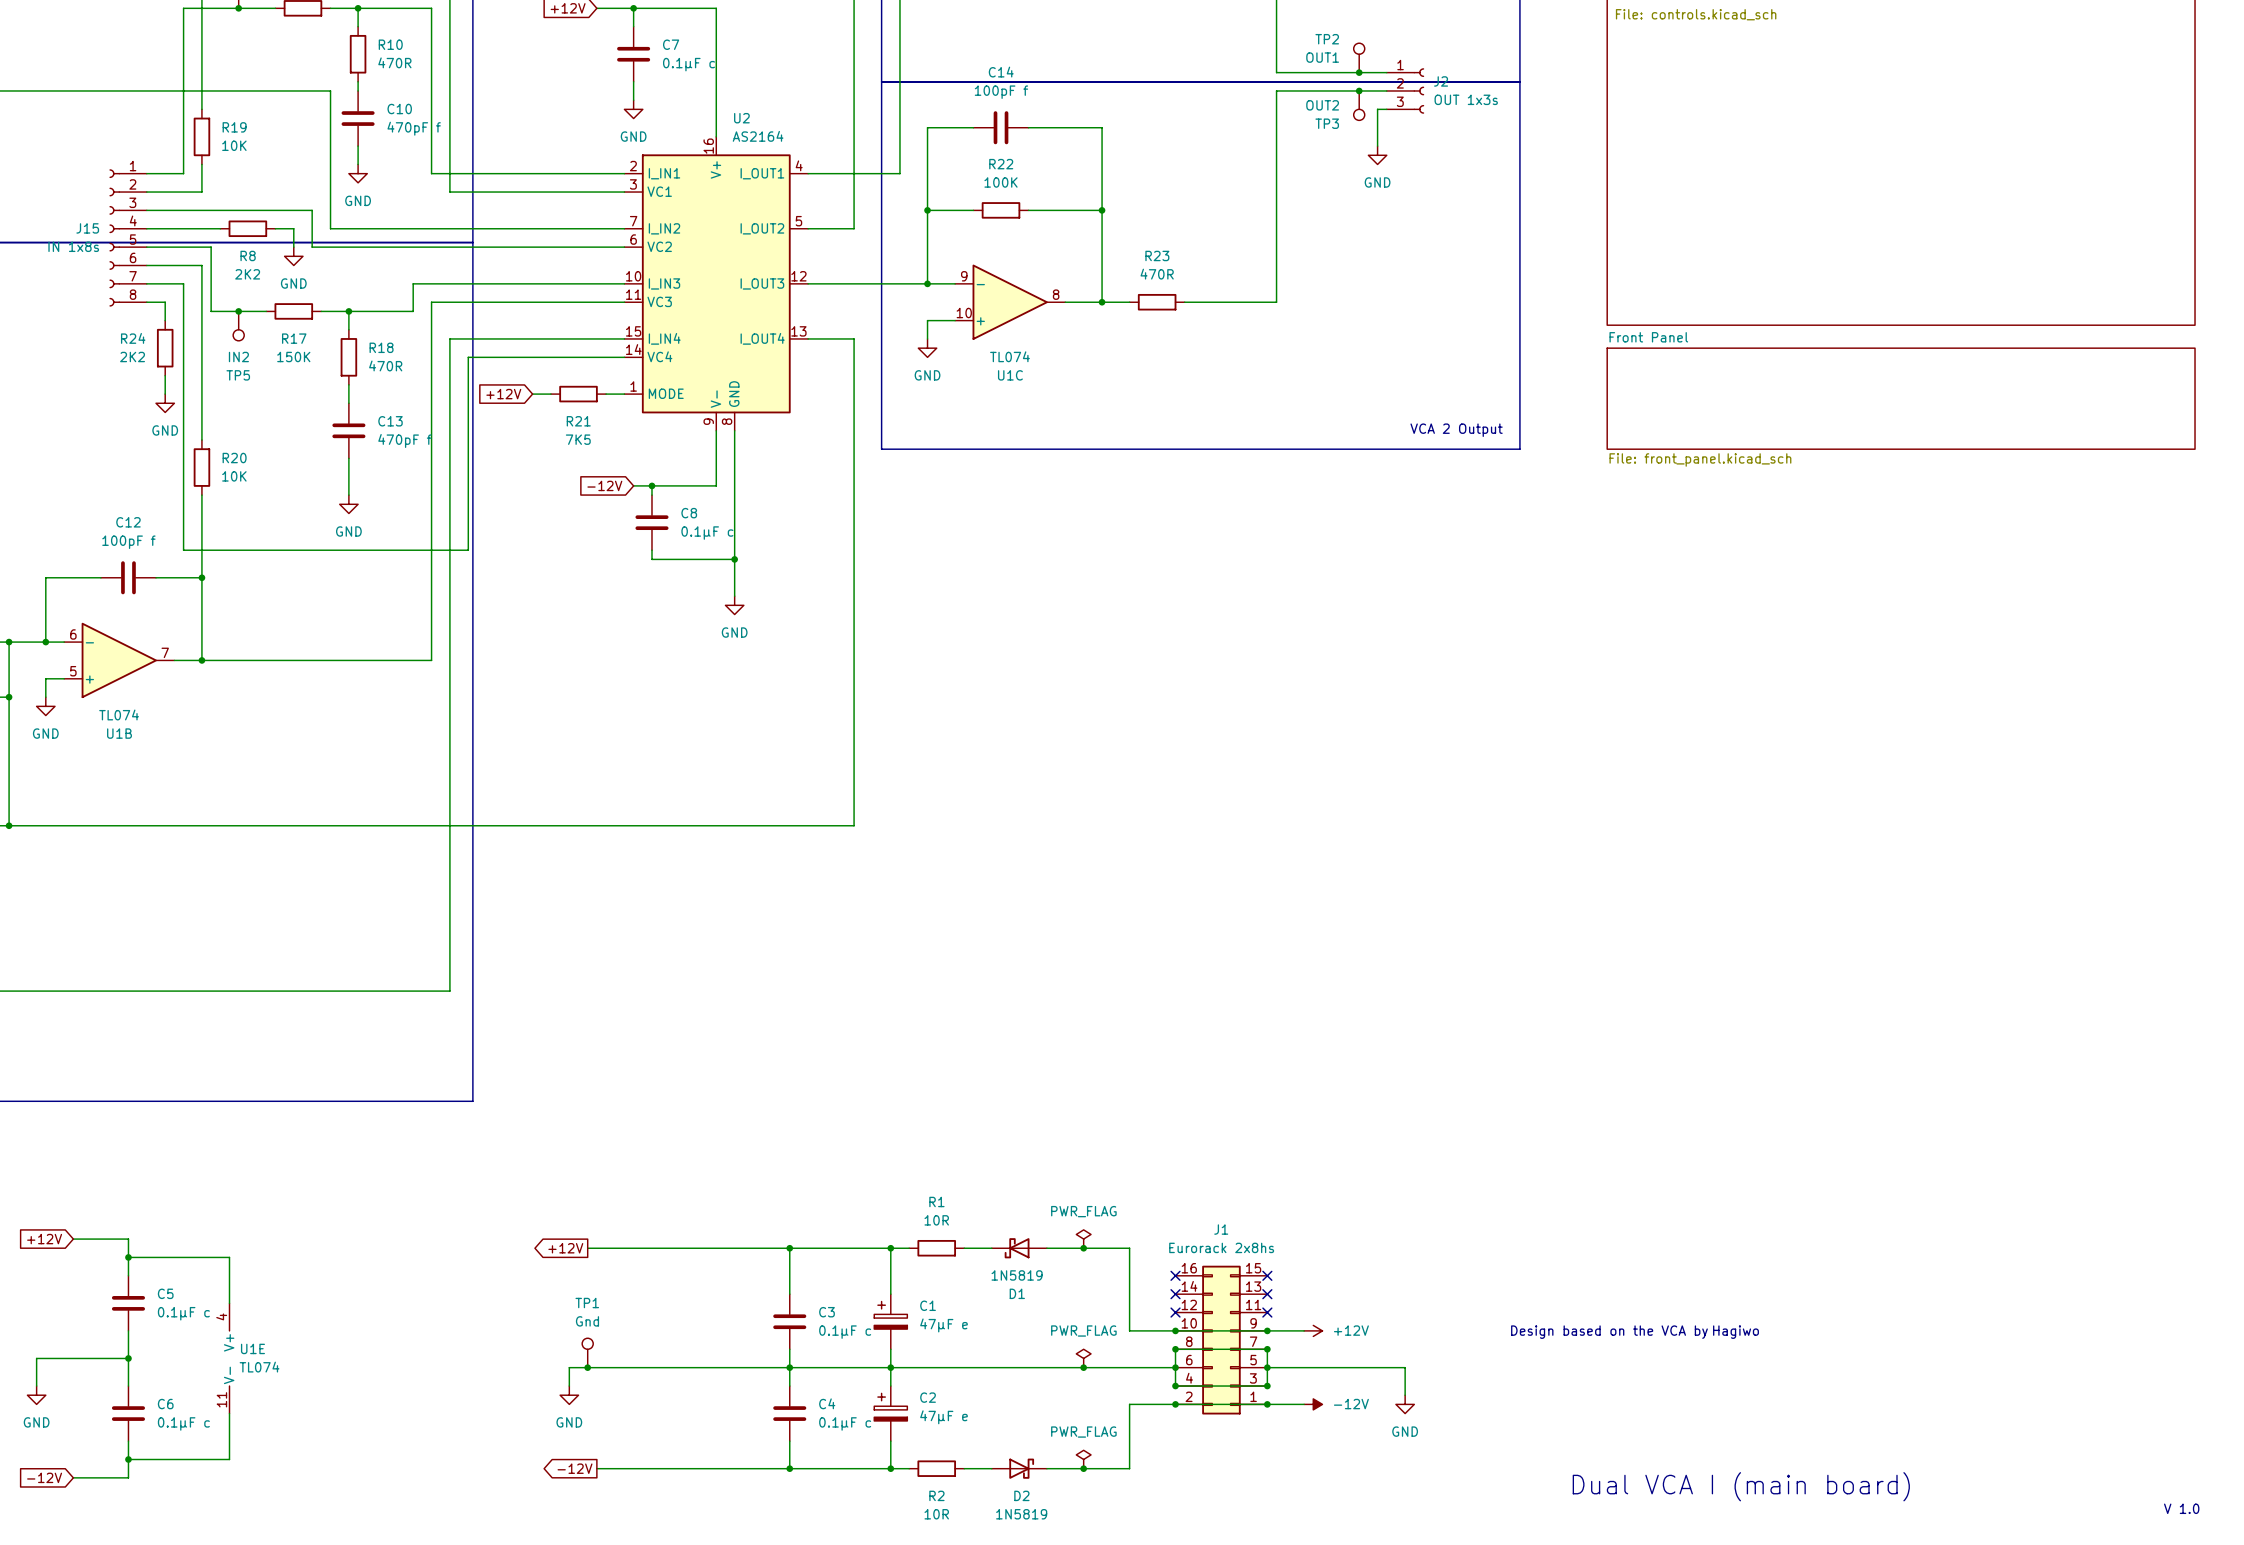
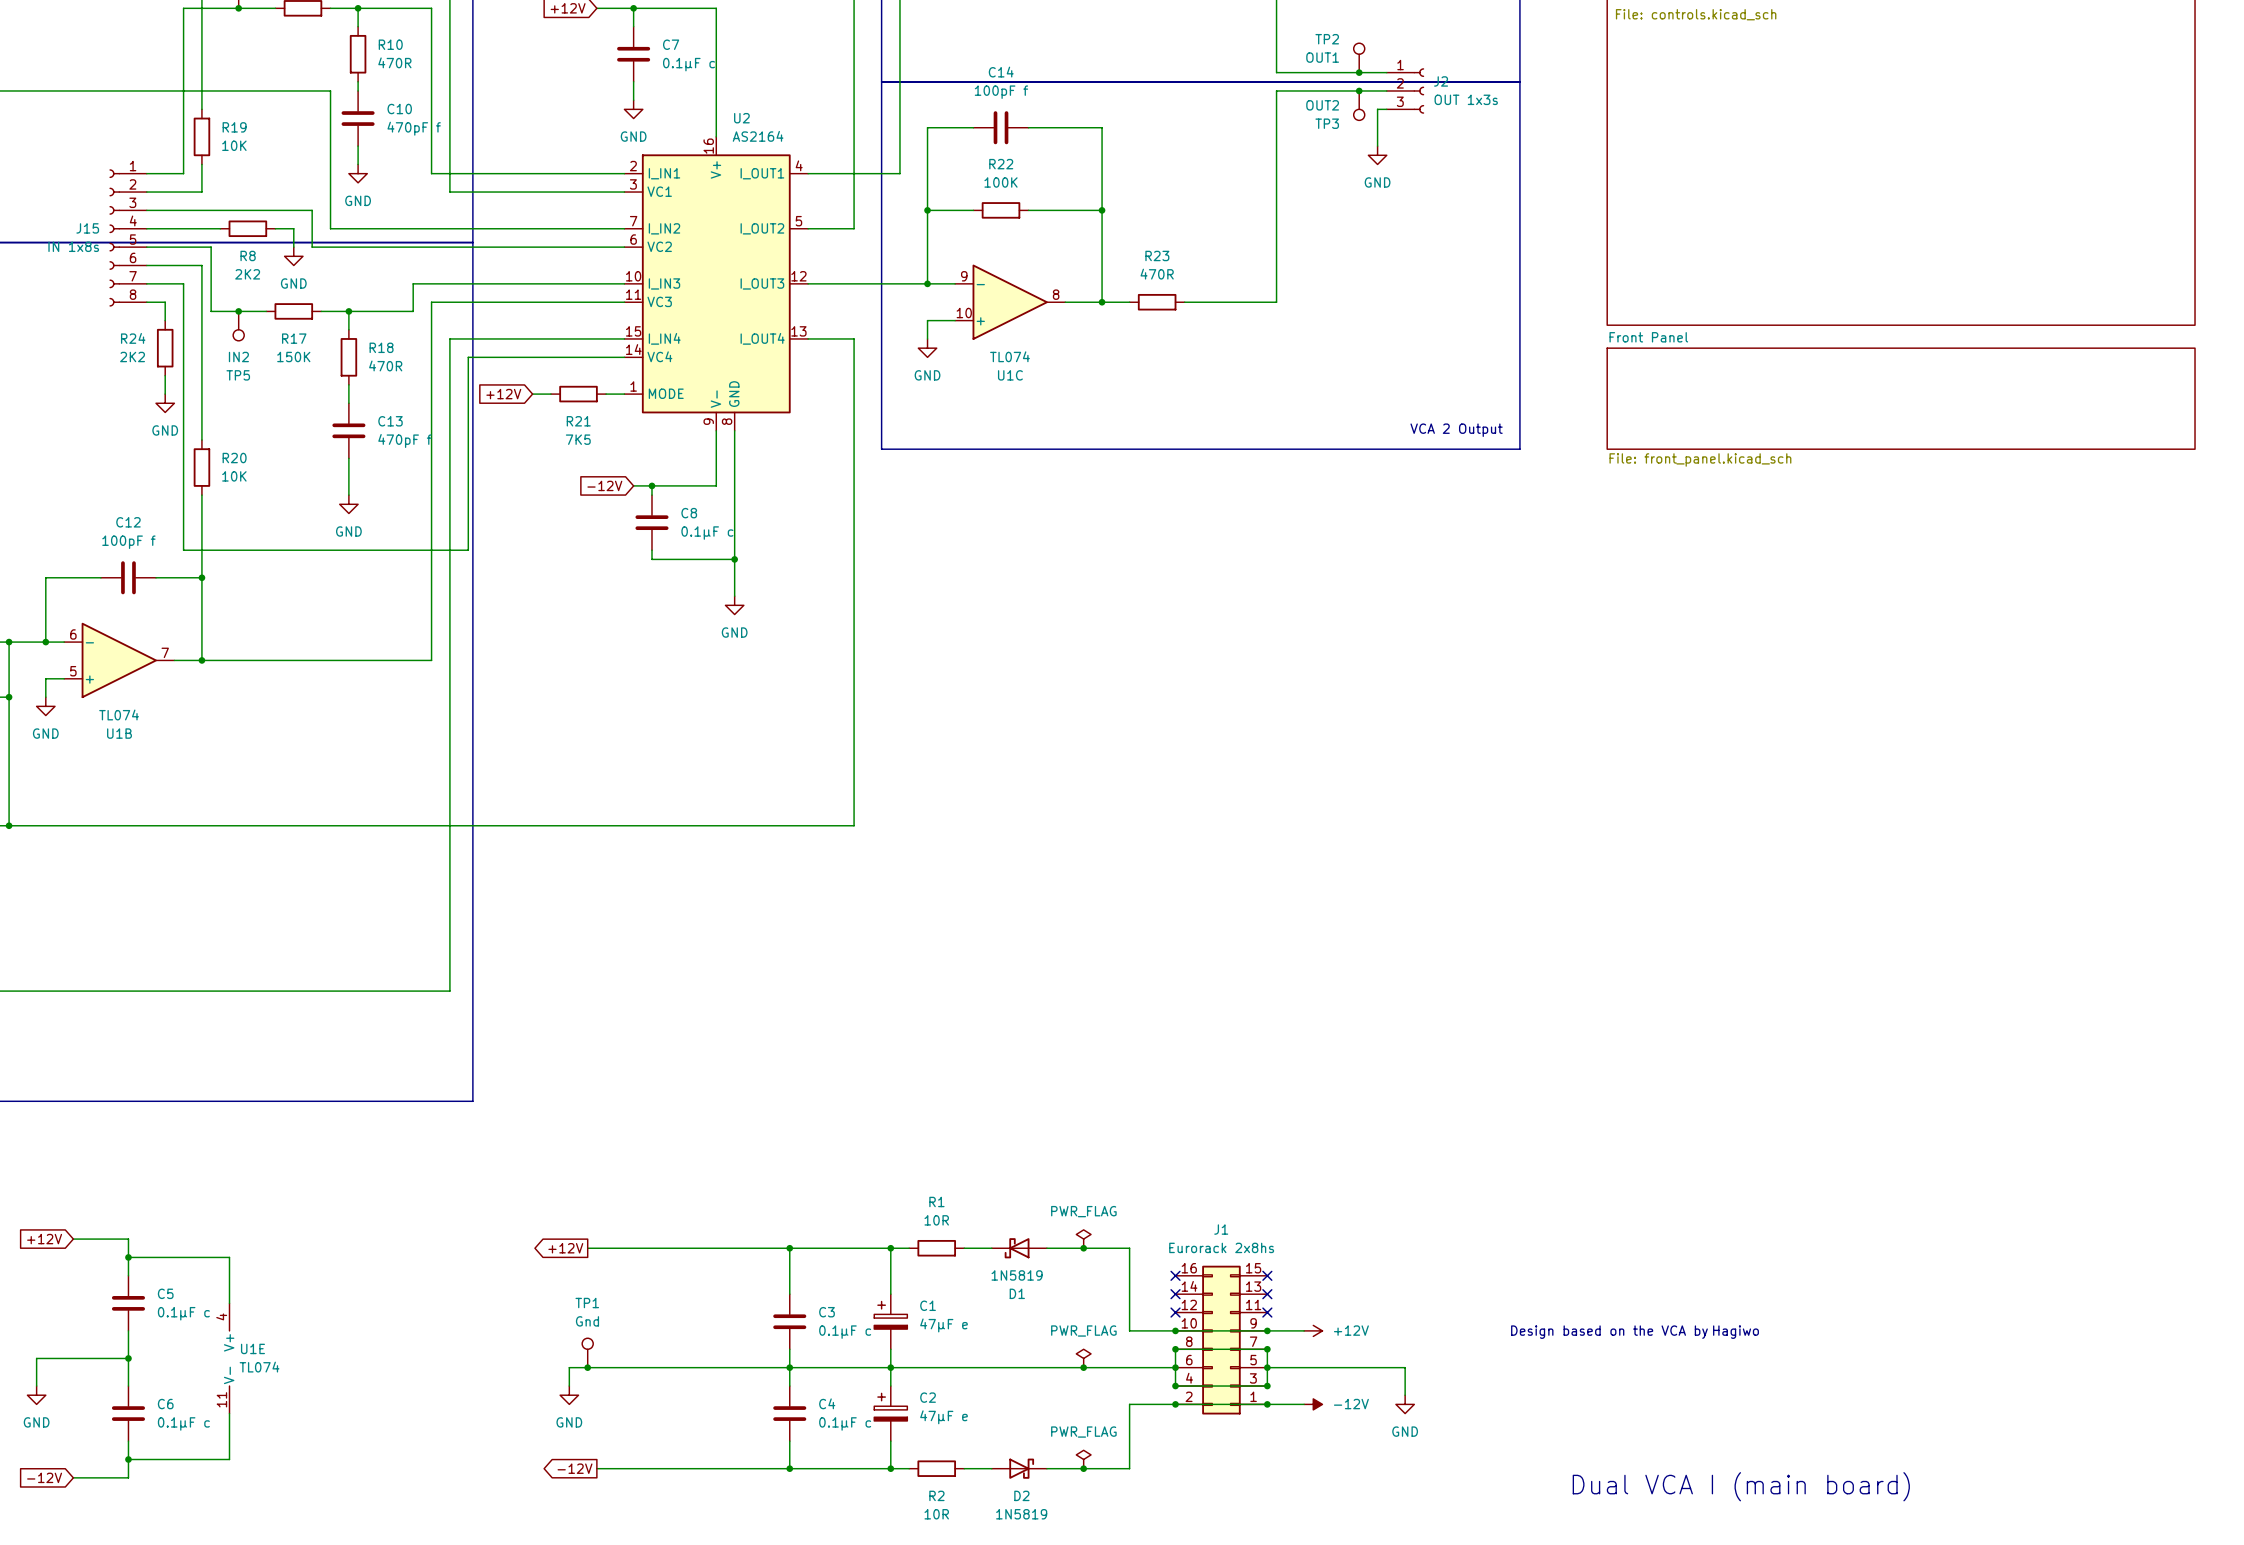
text: V 1.0 (2181, 1508) -> none

